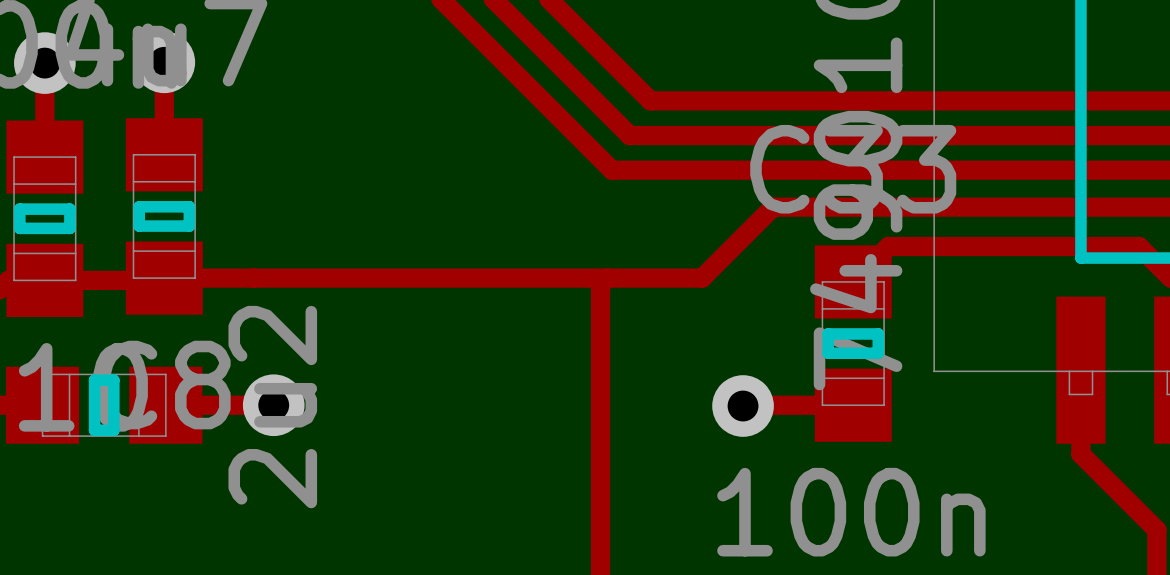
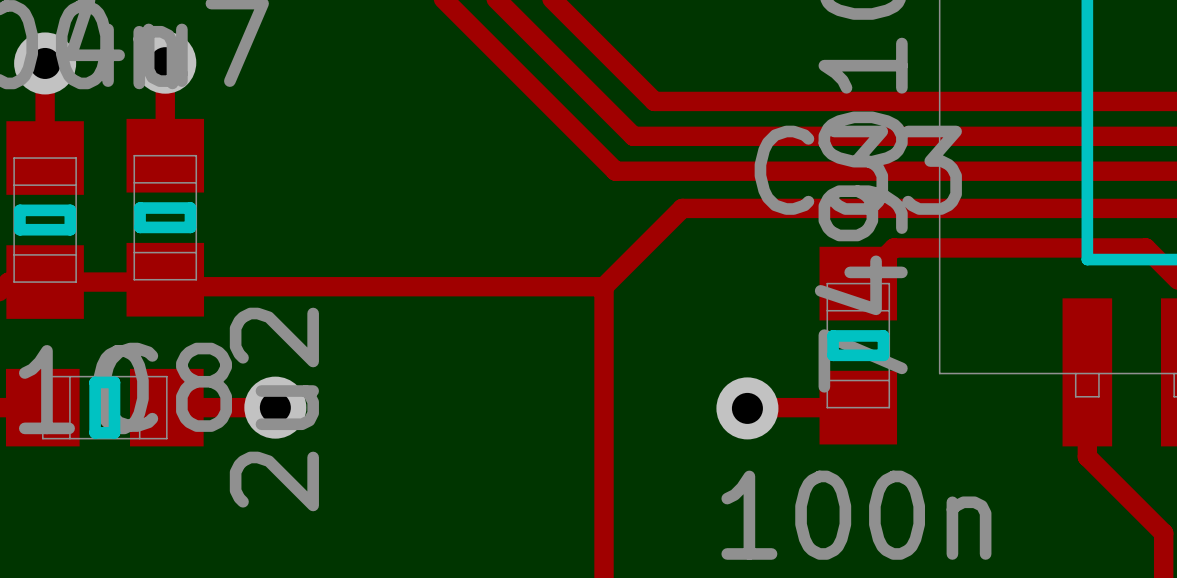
top track: (773, 207) (702, 278) (164, 278) -> (604, 286) (172, 286) (165, 279)
top track: none -> (777, 208) (682, 208) (611, 279)

